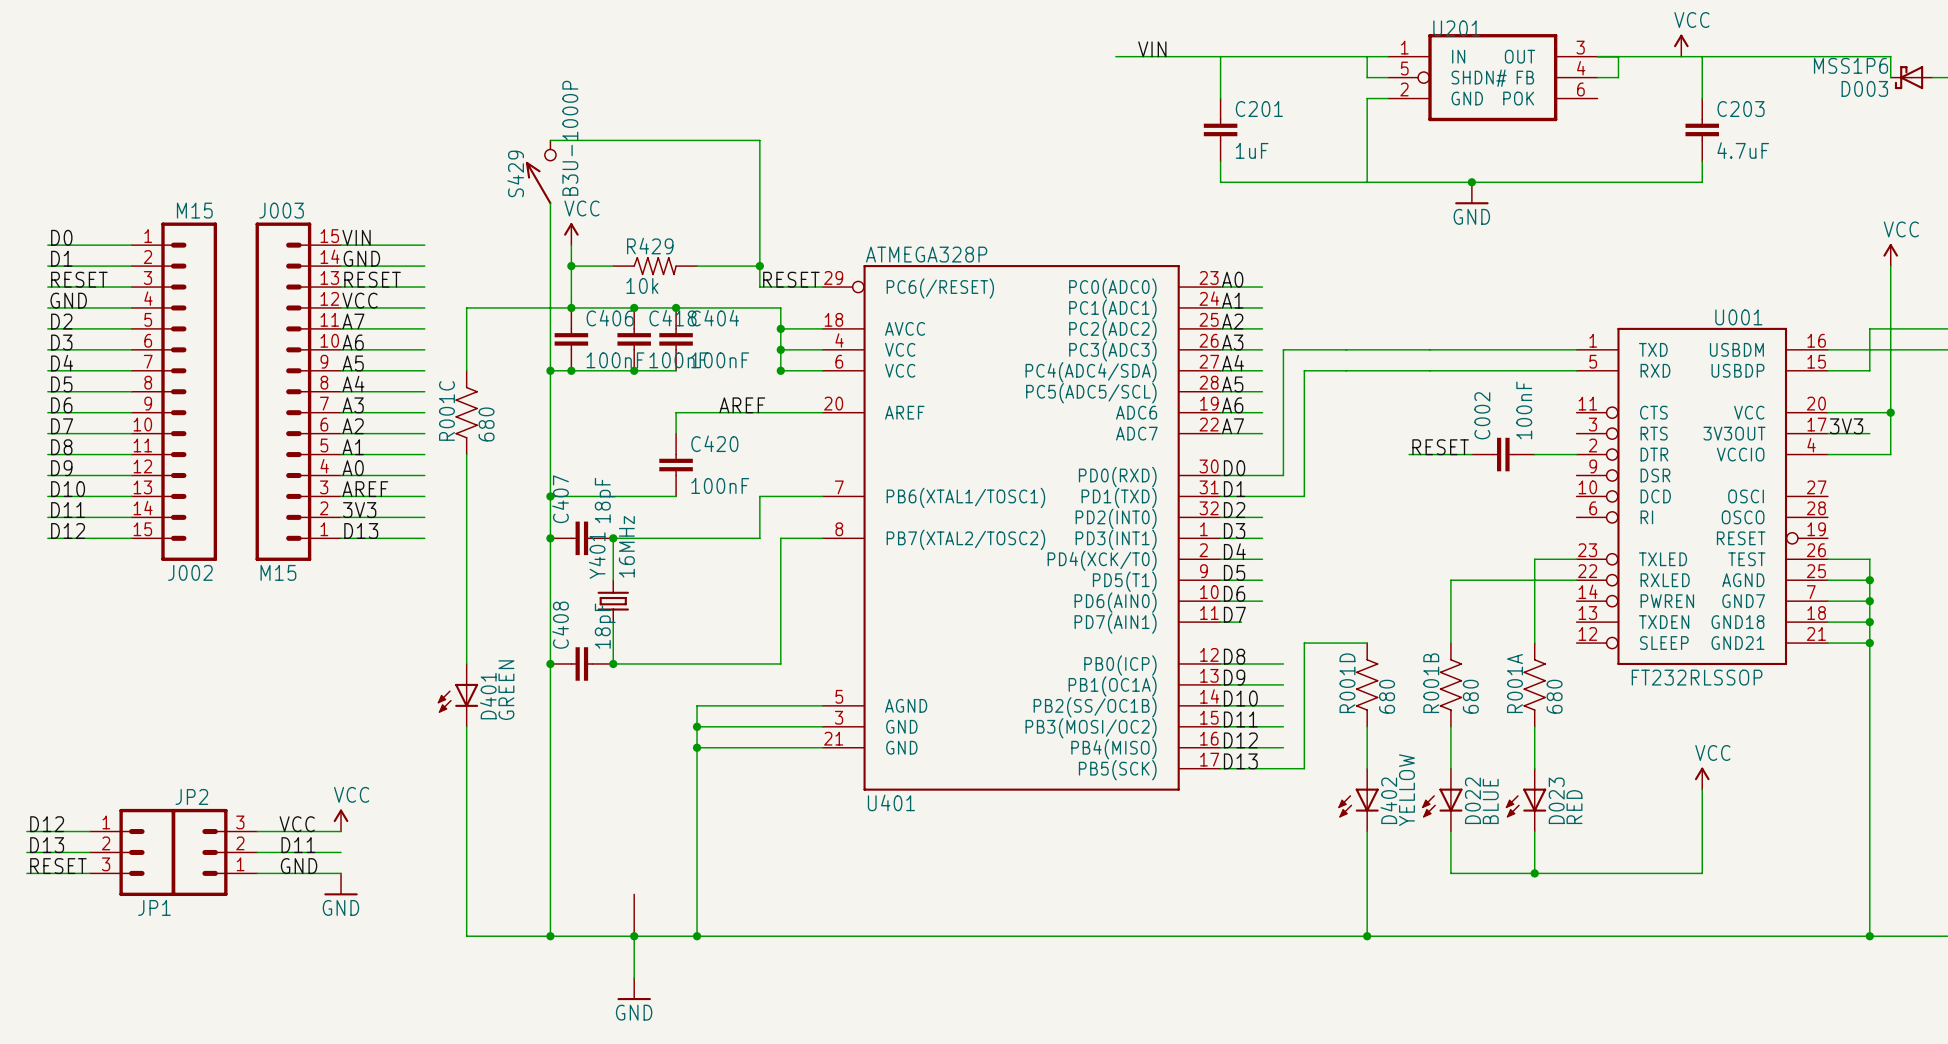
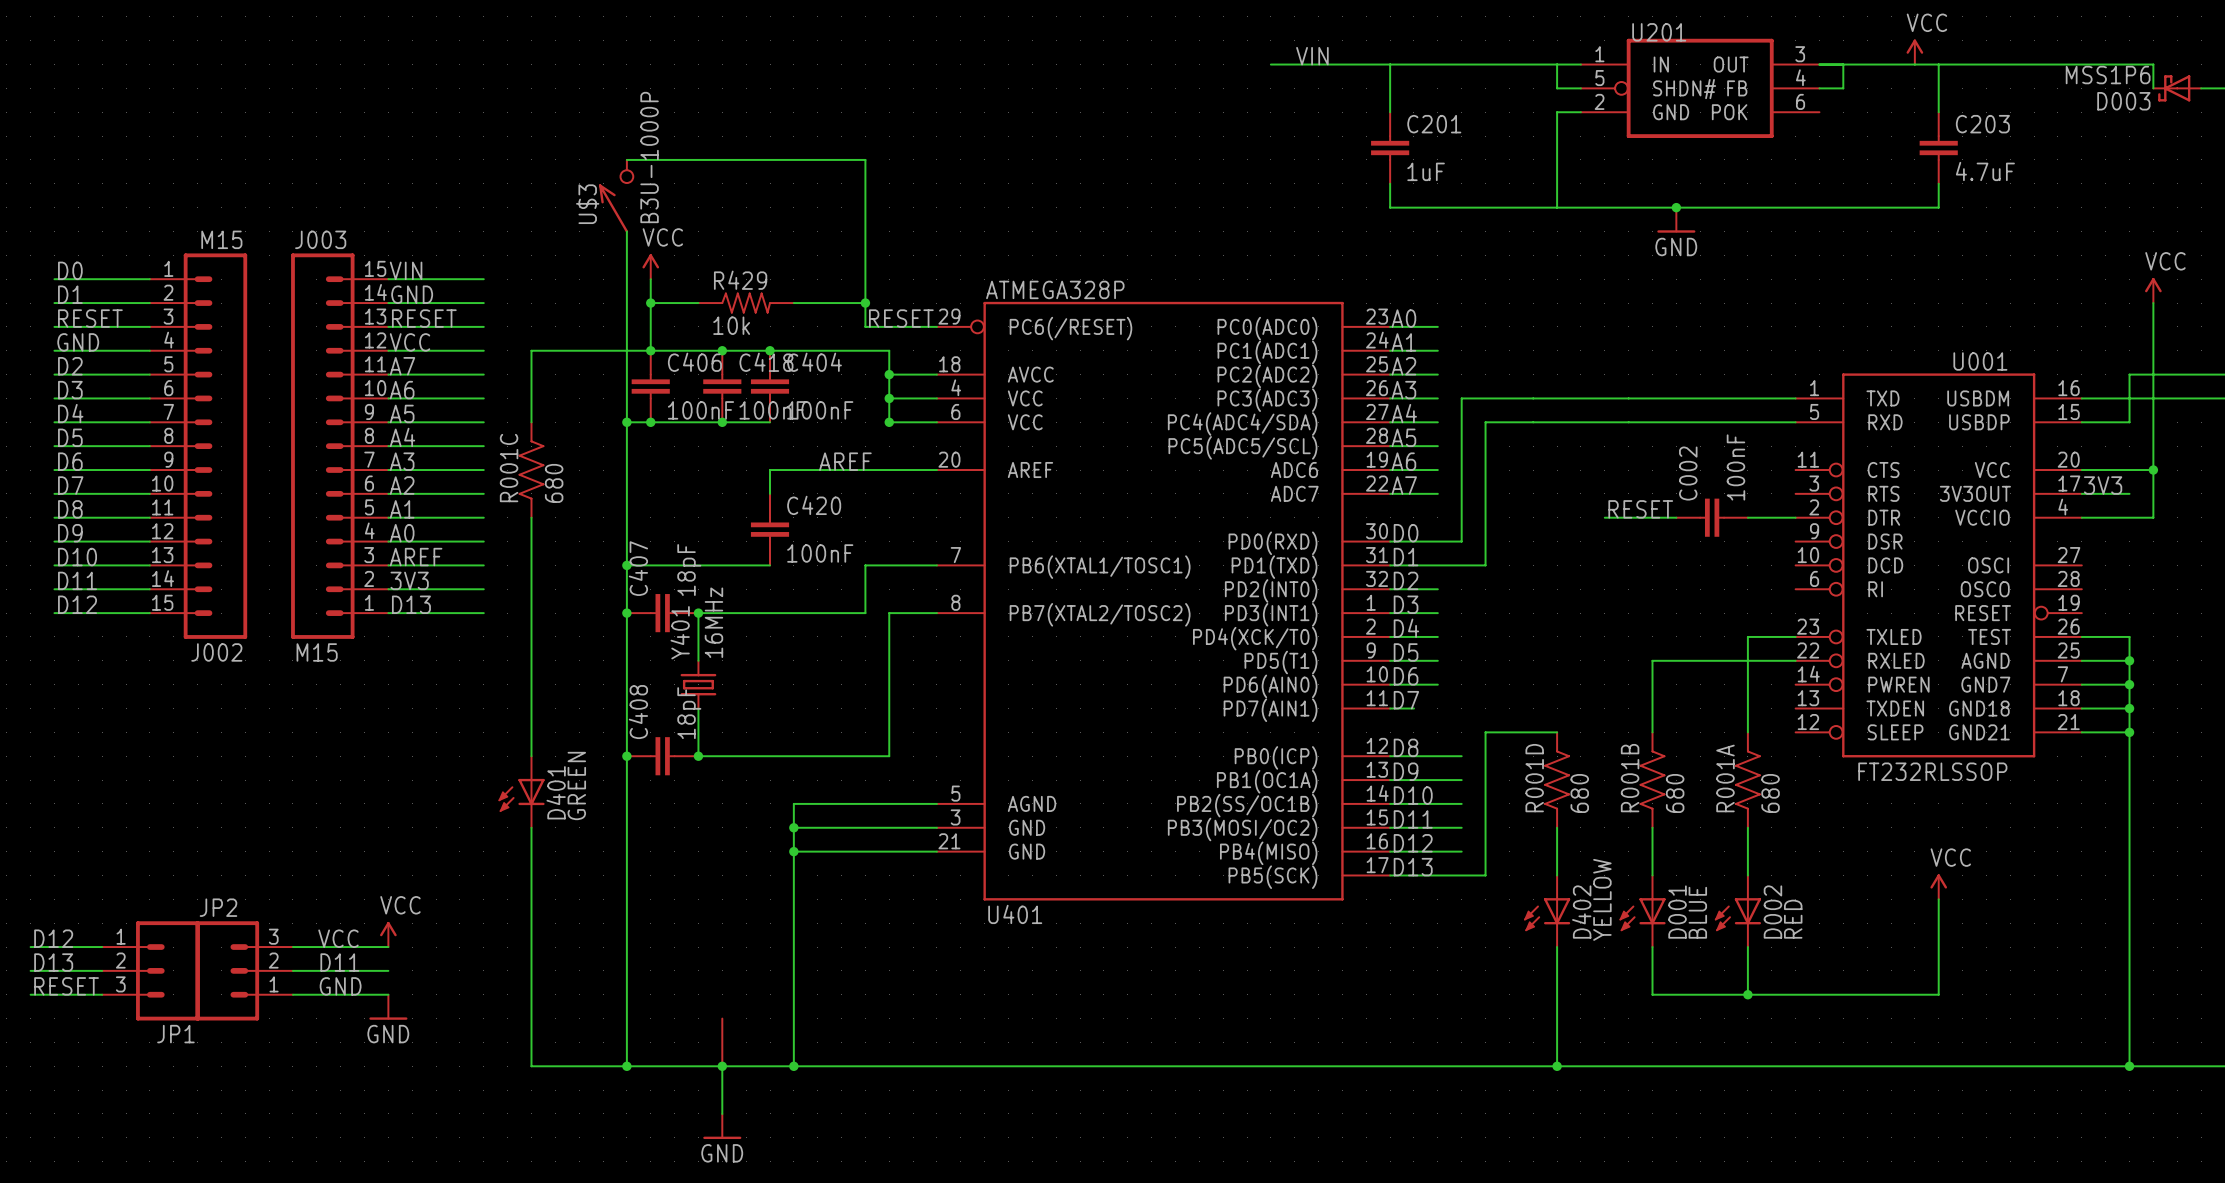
S429 name: S429 (515, 173) -> U$3 (587, 204)
D022 name: D022 (1472, 800) -> D001 (1677, 912)
D023 name: D023 (1556, 800) -> D002 (1772, 912)

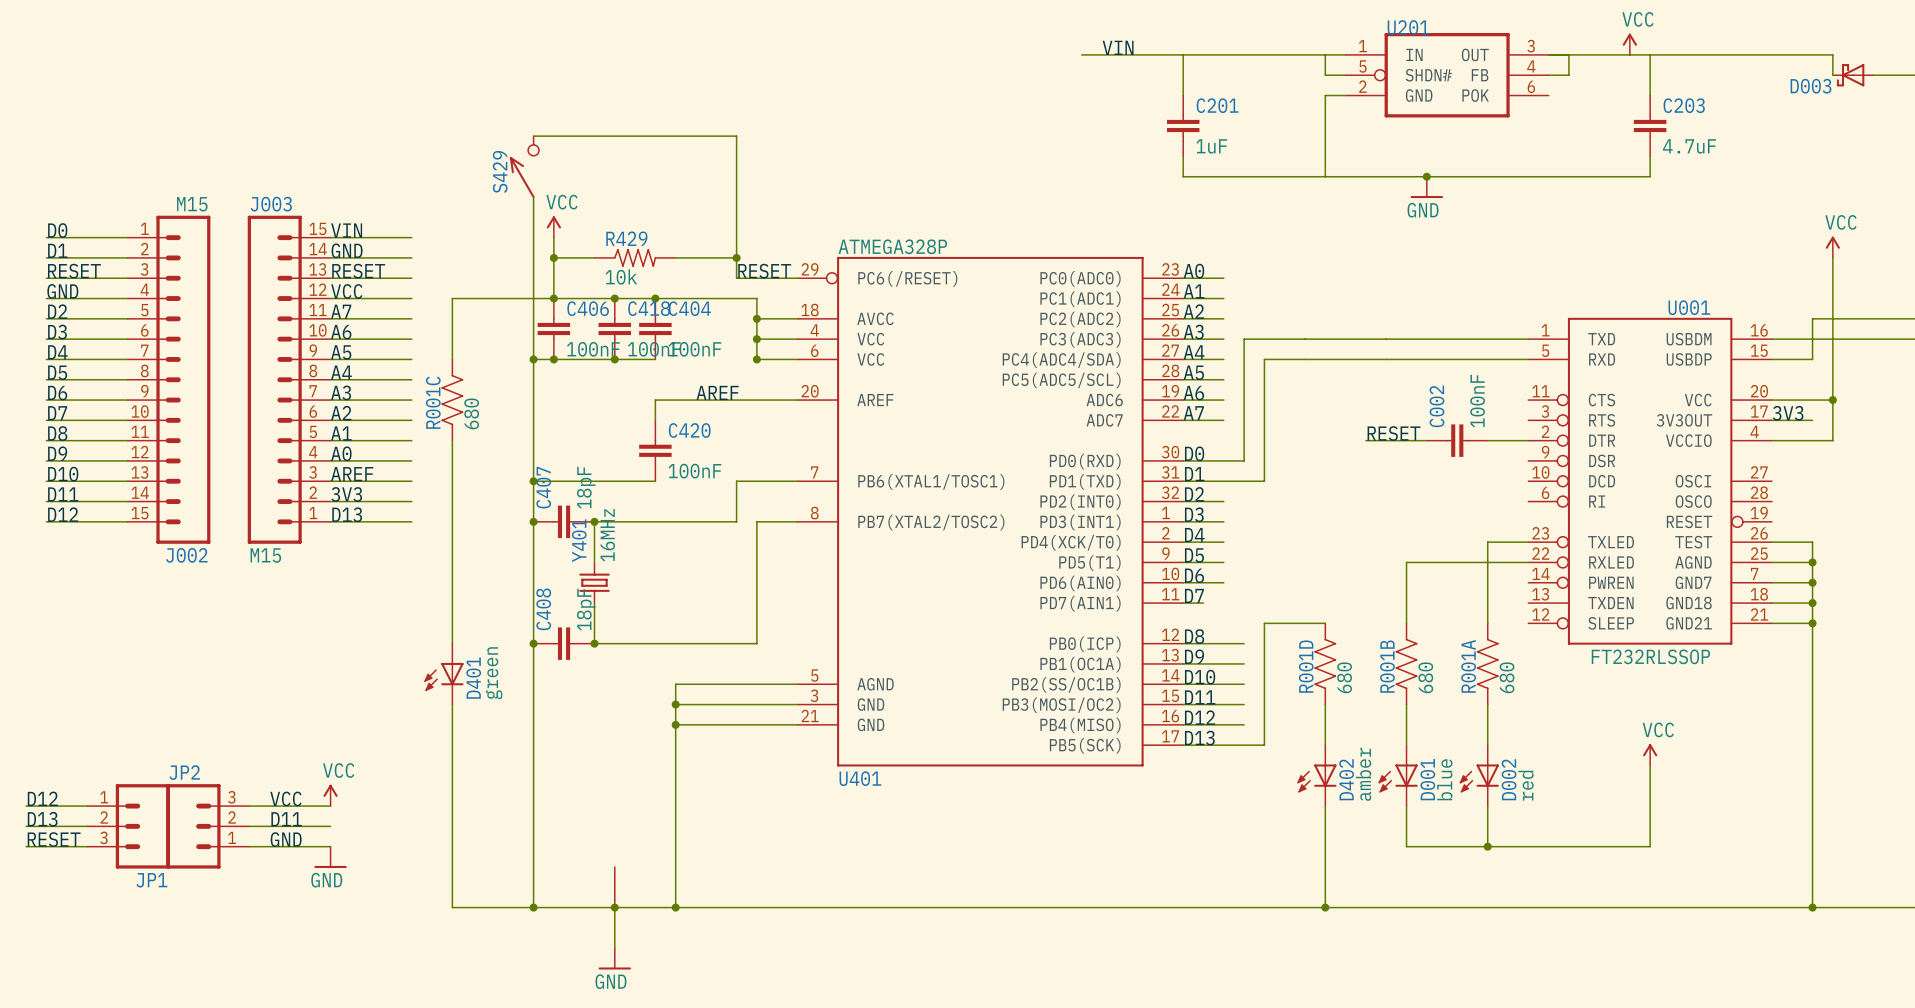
D003 value: MSS1P6 (2108, 75) -> none
U$3 value: B3U-1000P (649, 157) -> none
U$3 name: U$3 (587, 204) -> S429 (500, 171)
D401 value: GREEN (576, 785) -> green (494, 673)
D402 value: YELLOW (1602, 899) -> amber (1363, 774)
D001 value: BLUE (1697, 912) -> blue (1444, 779)
D002 value: RED (1793, 919) -> red (1526, 785)

